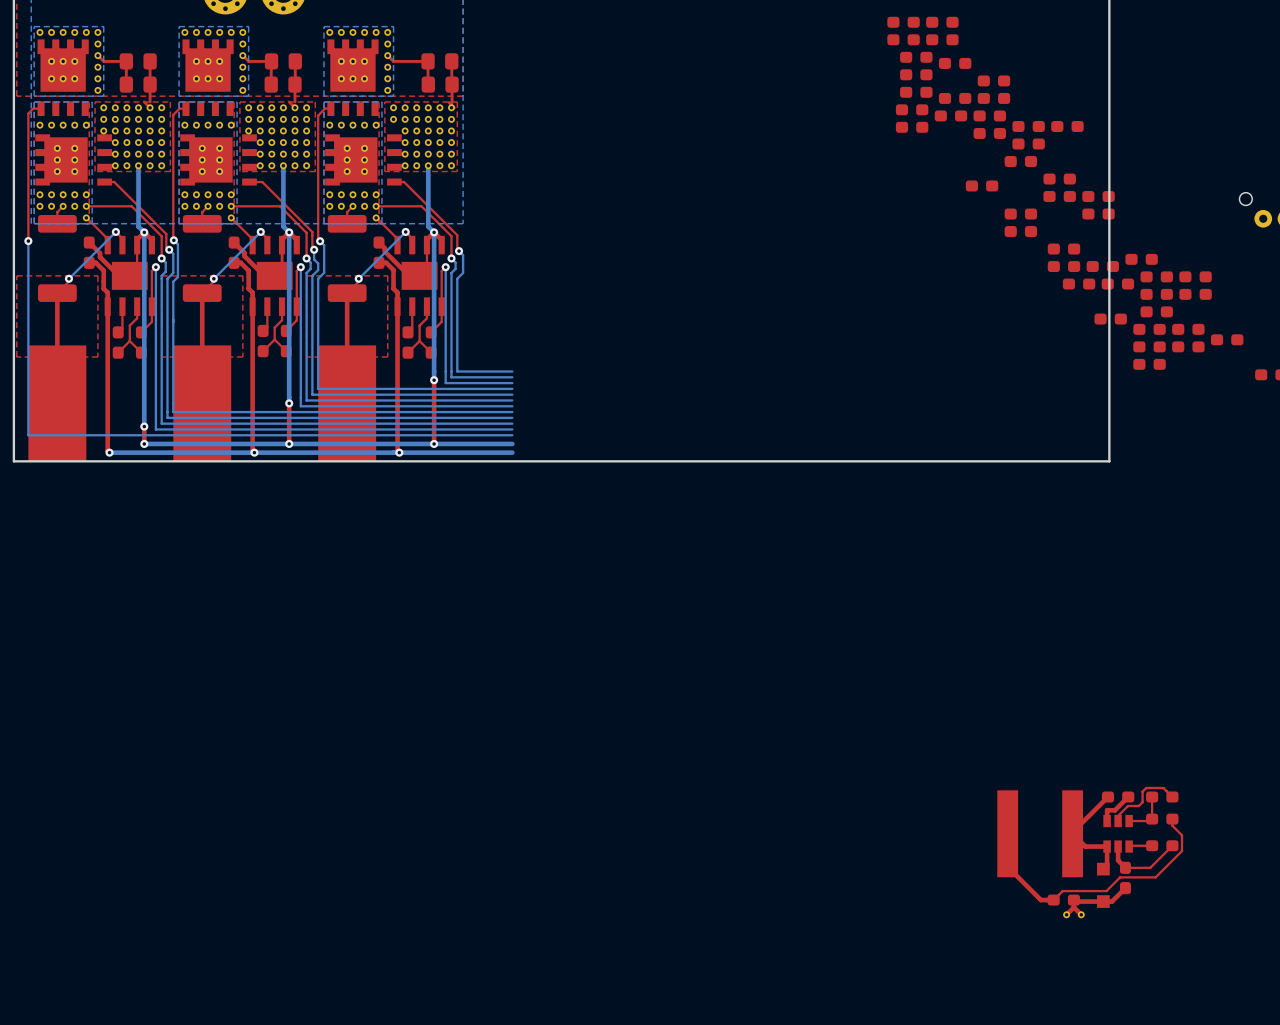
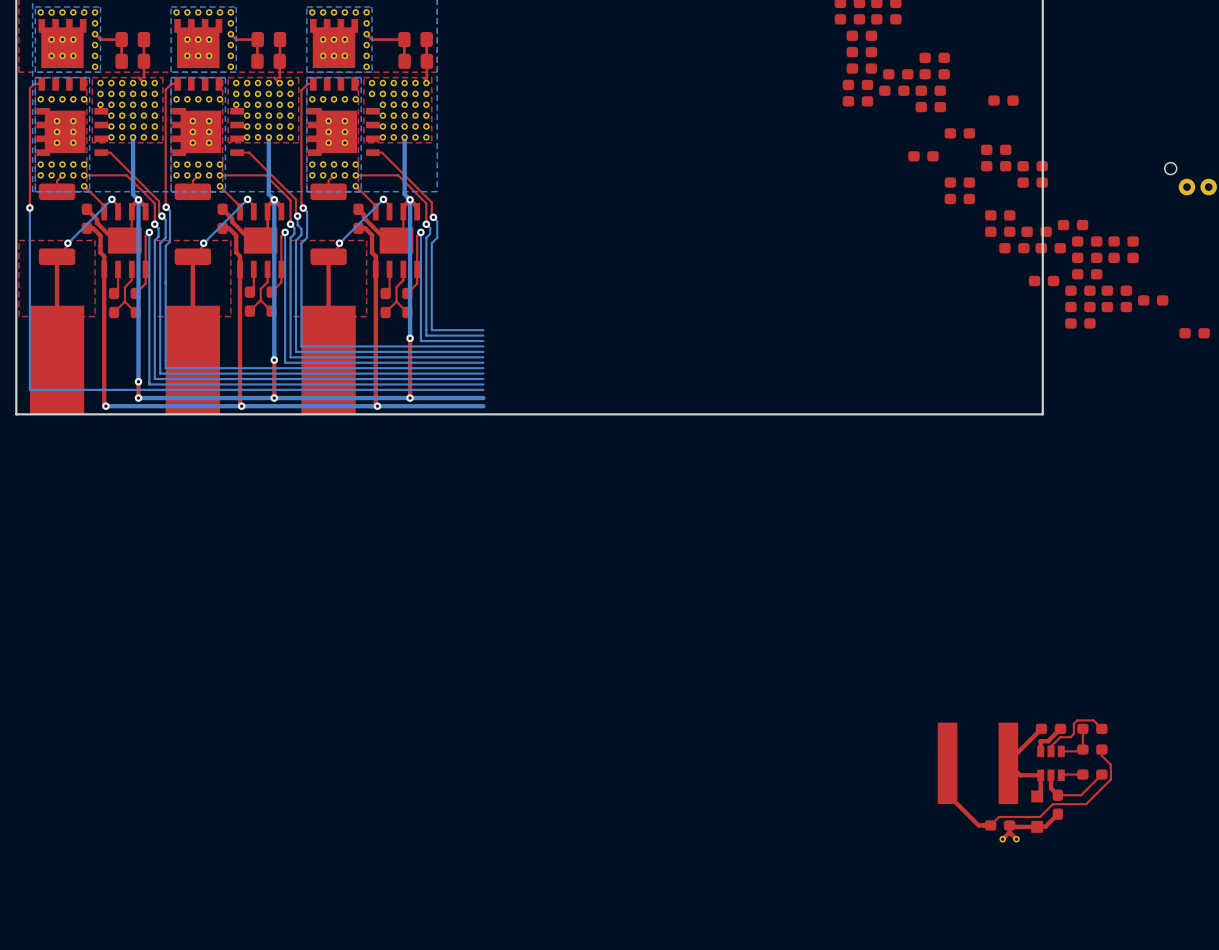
part: (955, 63) -> none
part: (1028, 126) -> none
part: (1028, 144) -> none

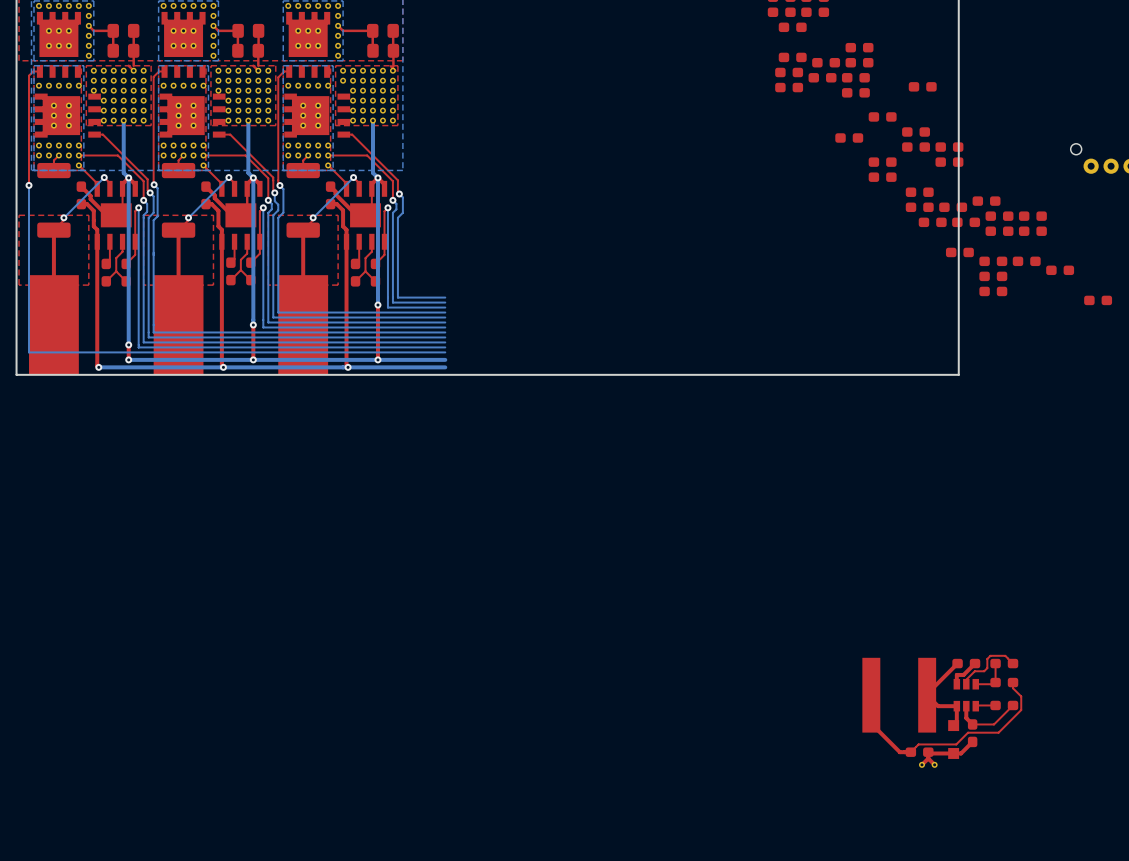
part: (861, 52) -> none
part: (1087, 274) -> none
part: (1116, 307) -> none

